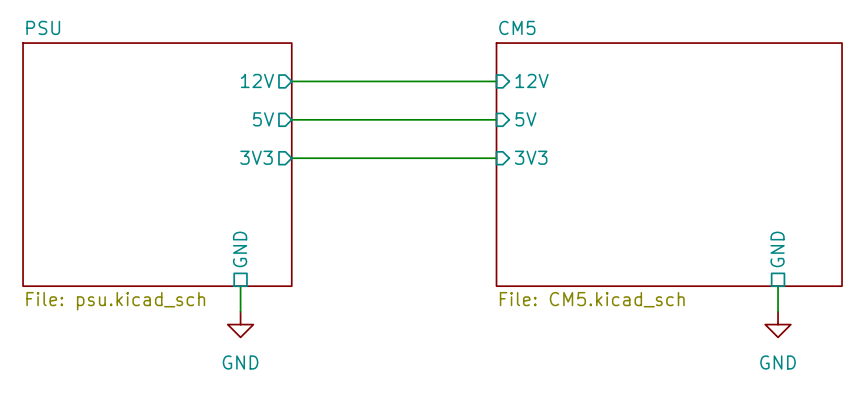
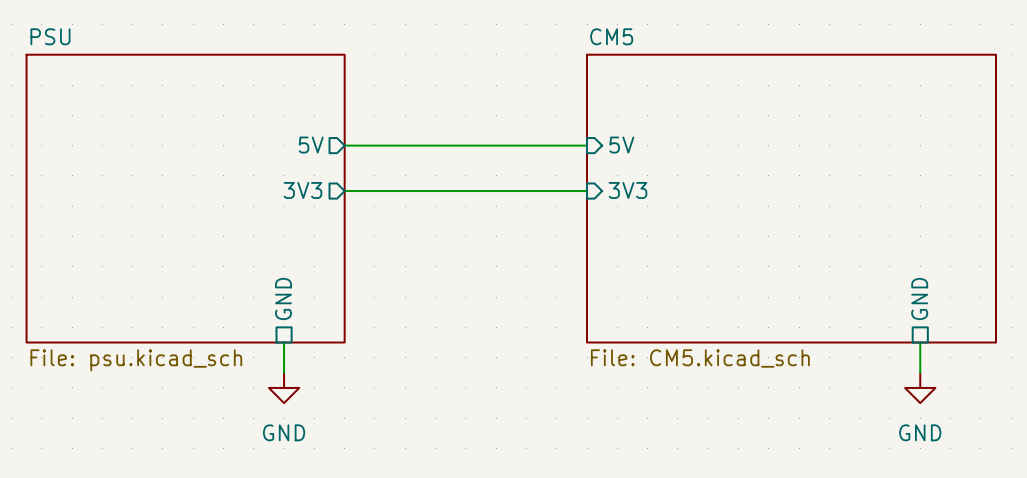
sheet pin: 12V (257, 80) -> none
sheet pin: 12V (532, 80) -> none
wire: (291, 81) (496, 81) -> none

